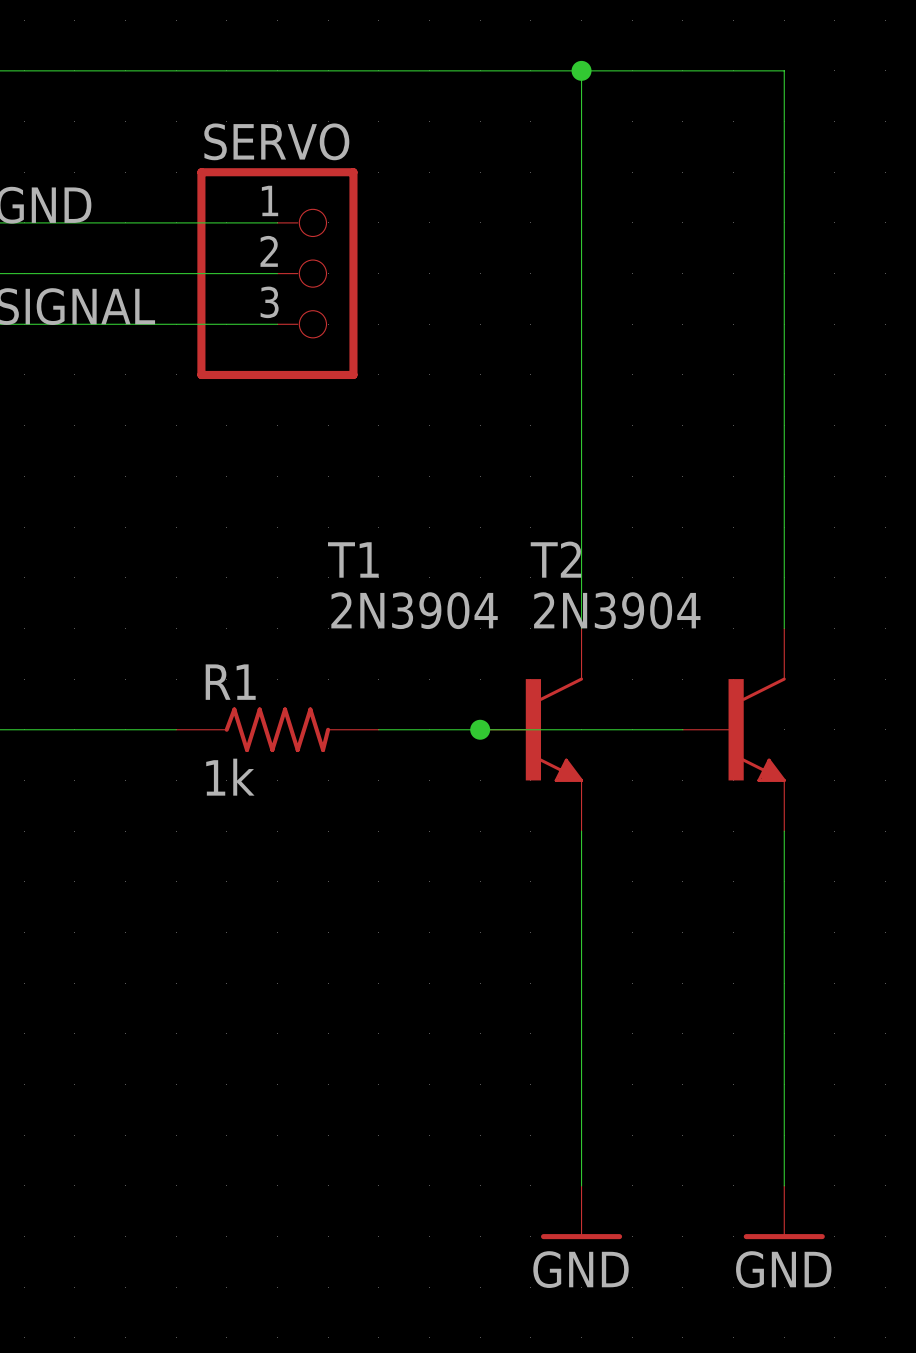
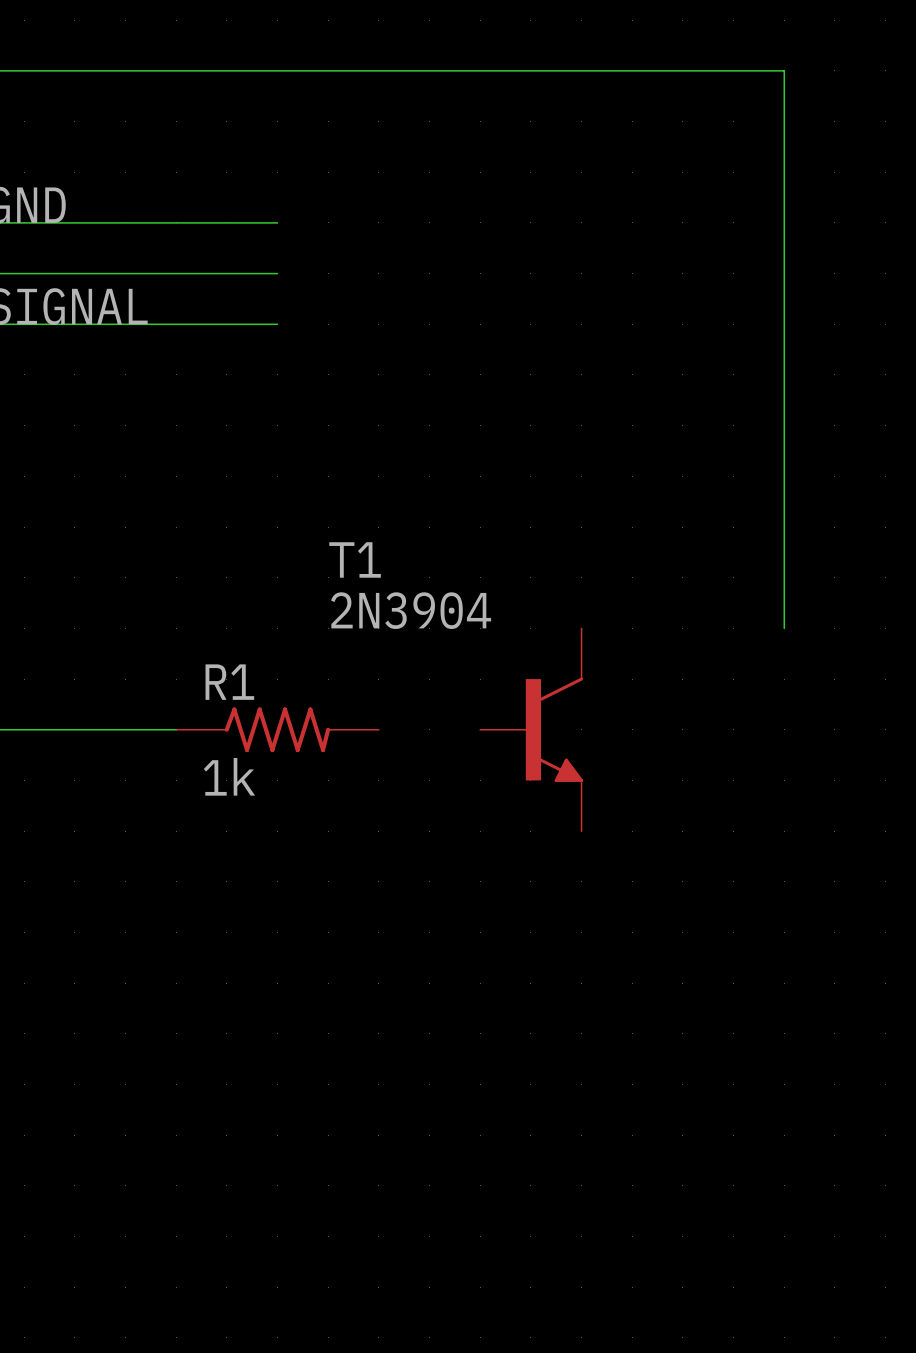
wire: (581, 70) (581, 628) -> none
junction: (581, 70) -> none
SERVO: (277, 273) -> none
wire: (378, 729) (682, 729) -> none
junction: (480, 729) -> none
T2: 2N3904 (734, 729) -> none
wire: (581, 831) (581, 1185) -> none
wire: (784, 831) (784, 1185) -> none
power symbol: GND (581, 1212) -> none
power symbol: GND (784, 1212) -> none

